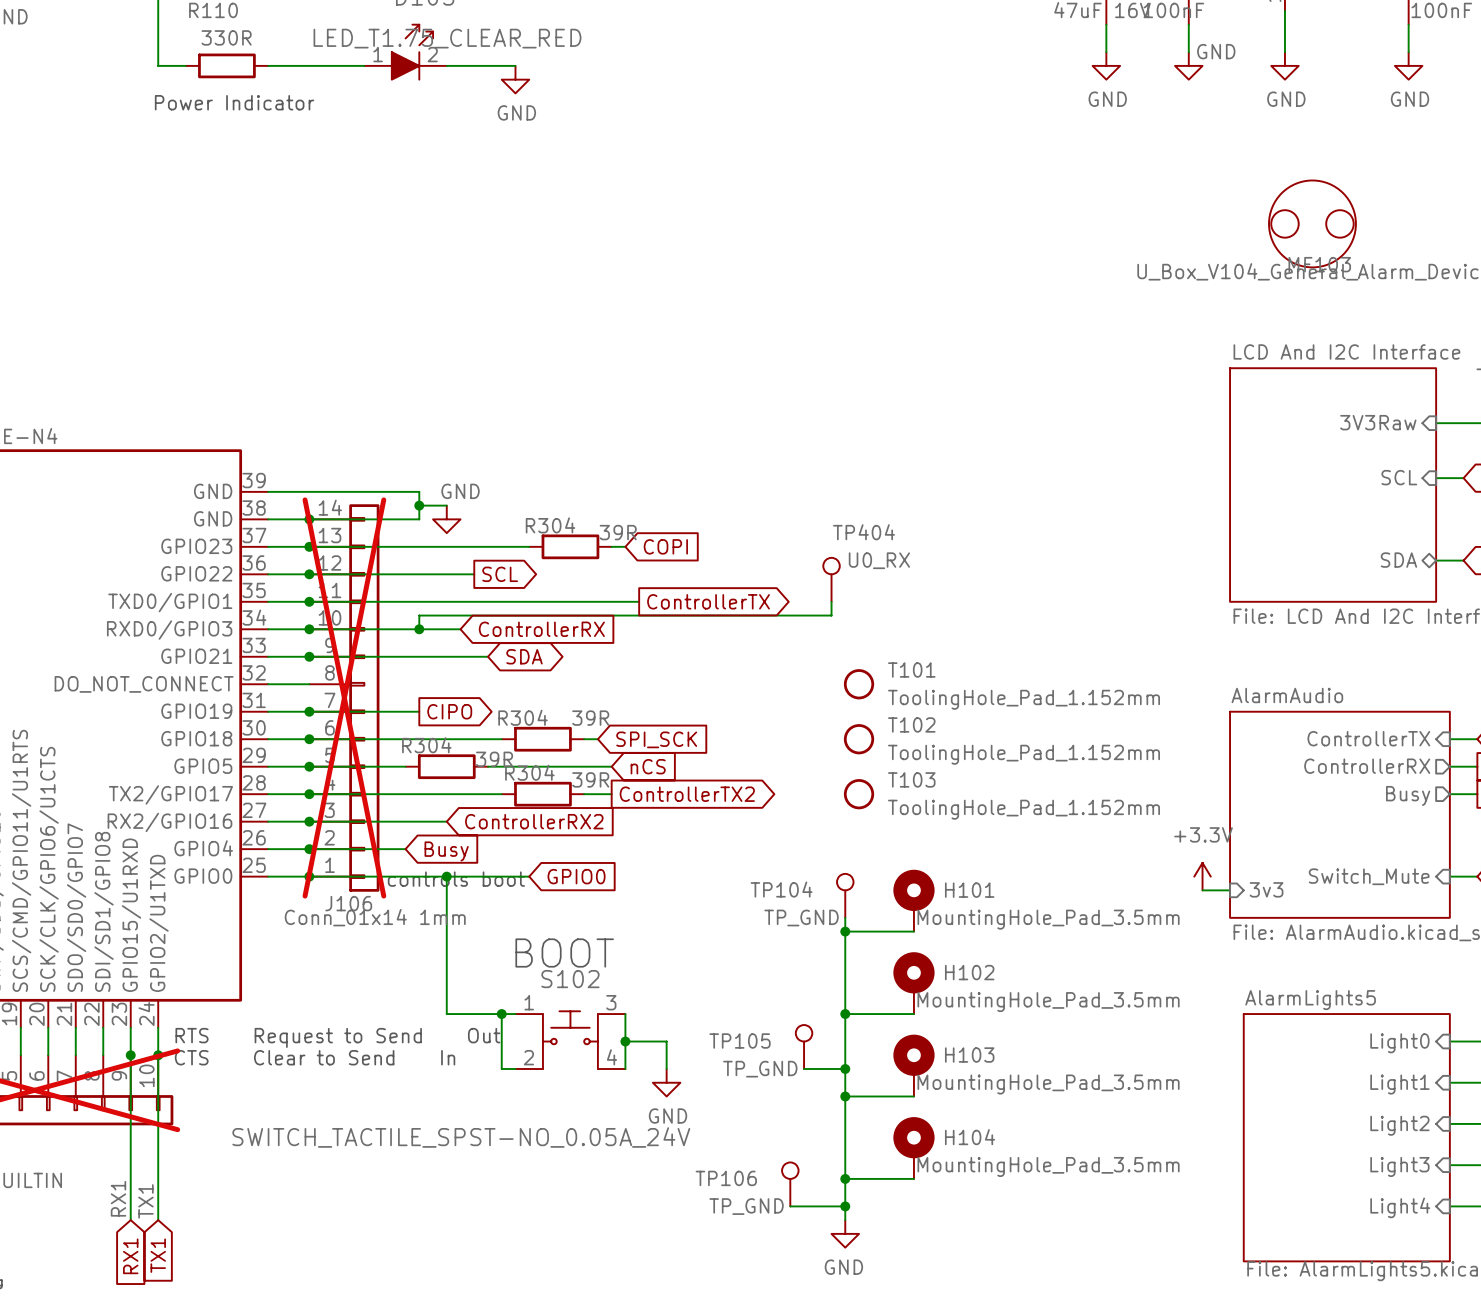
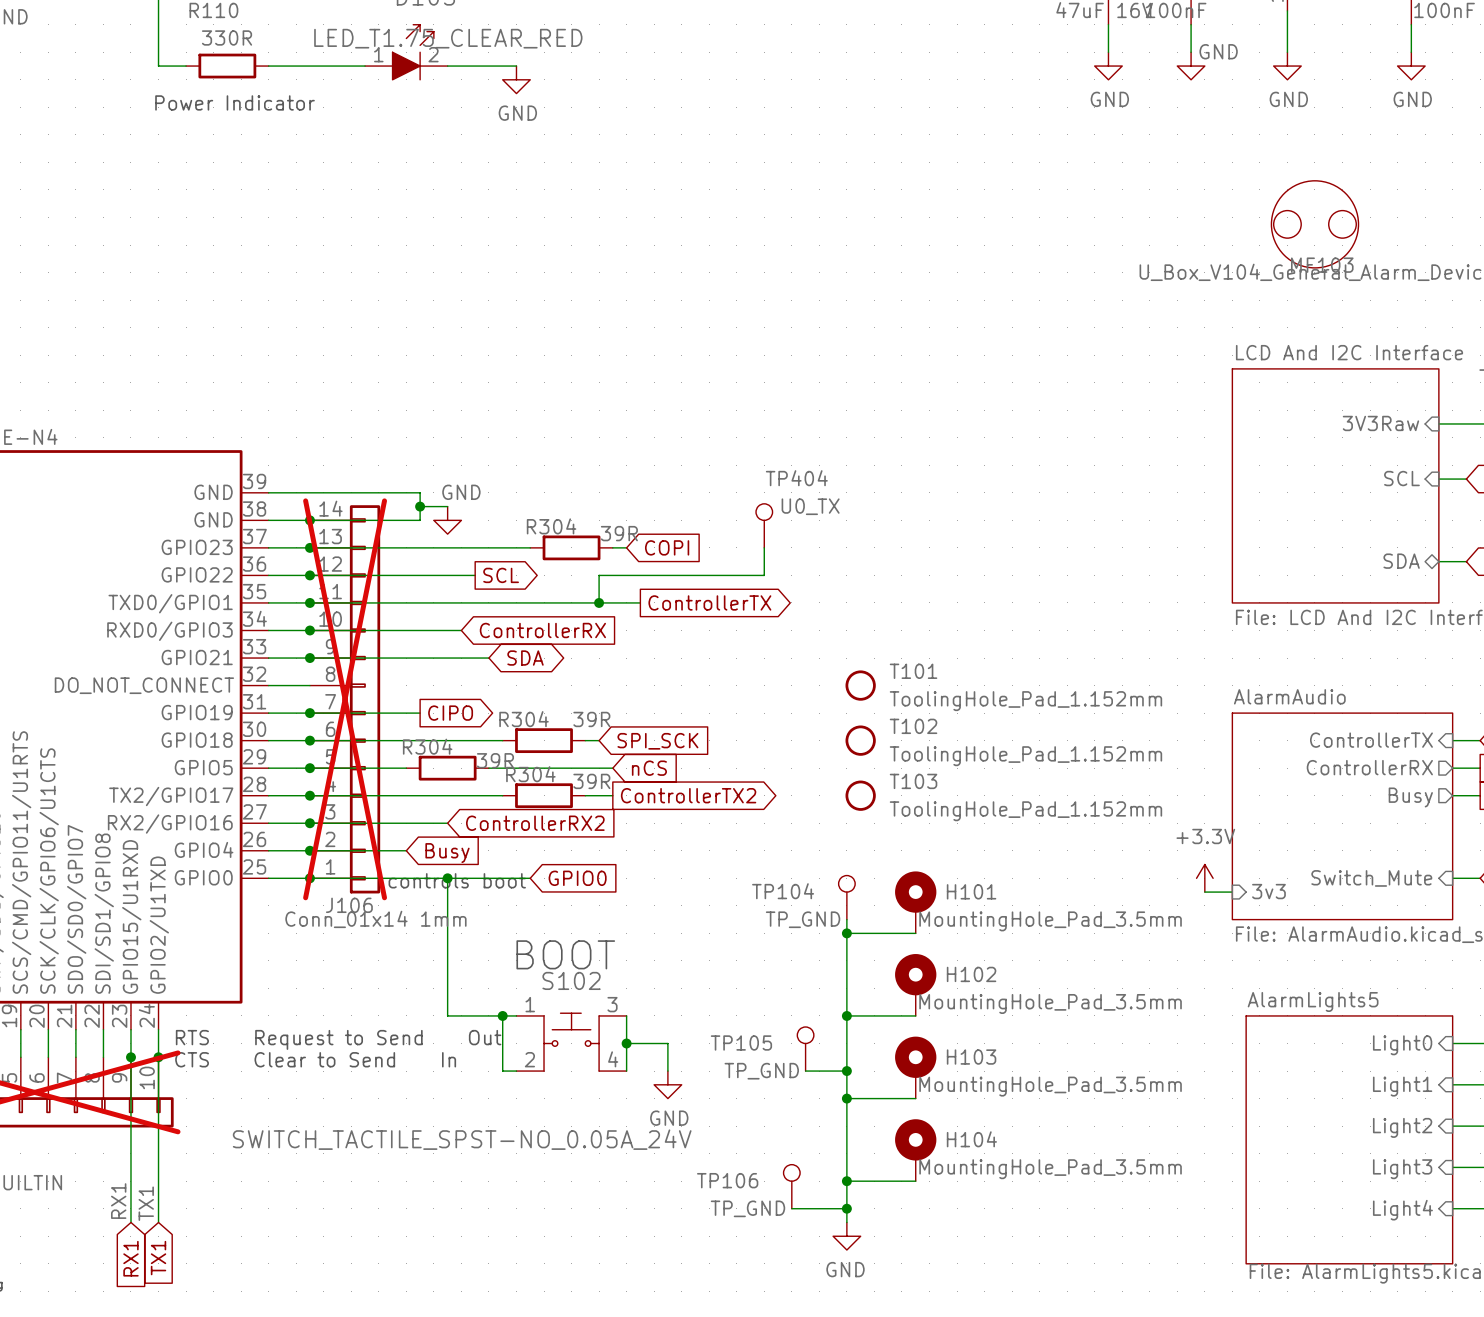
wire: none -> (764, 547) (764, 575) (599, 575) (599, 602)
TP404 value: U0_RX (879, 560) -> U0_TX (810, 506)
TP404 position: (831, 579) -> (764, 525)
junction: none -> (599, 602)
wire: (831, 601) (831, 615) (419, 615) (419, 629) -> none
junction: (419, 629) -> none

